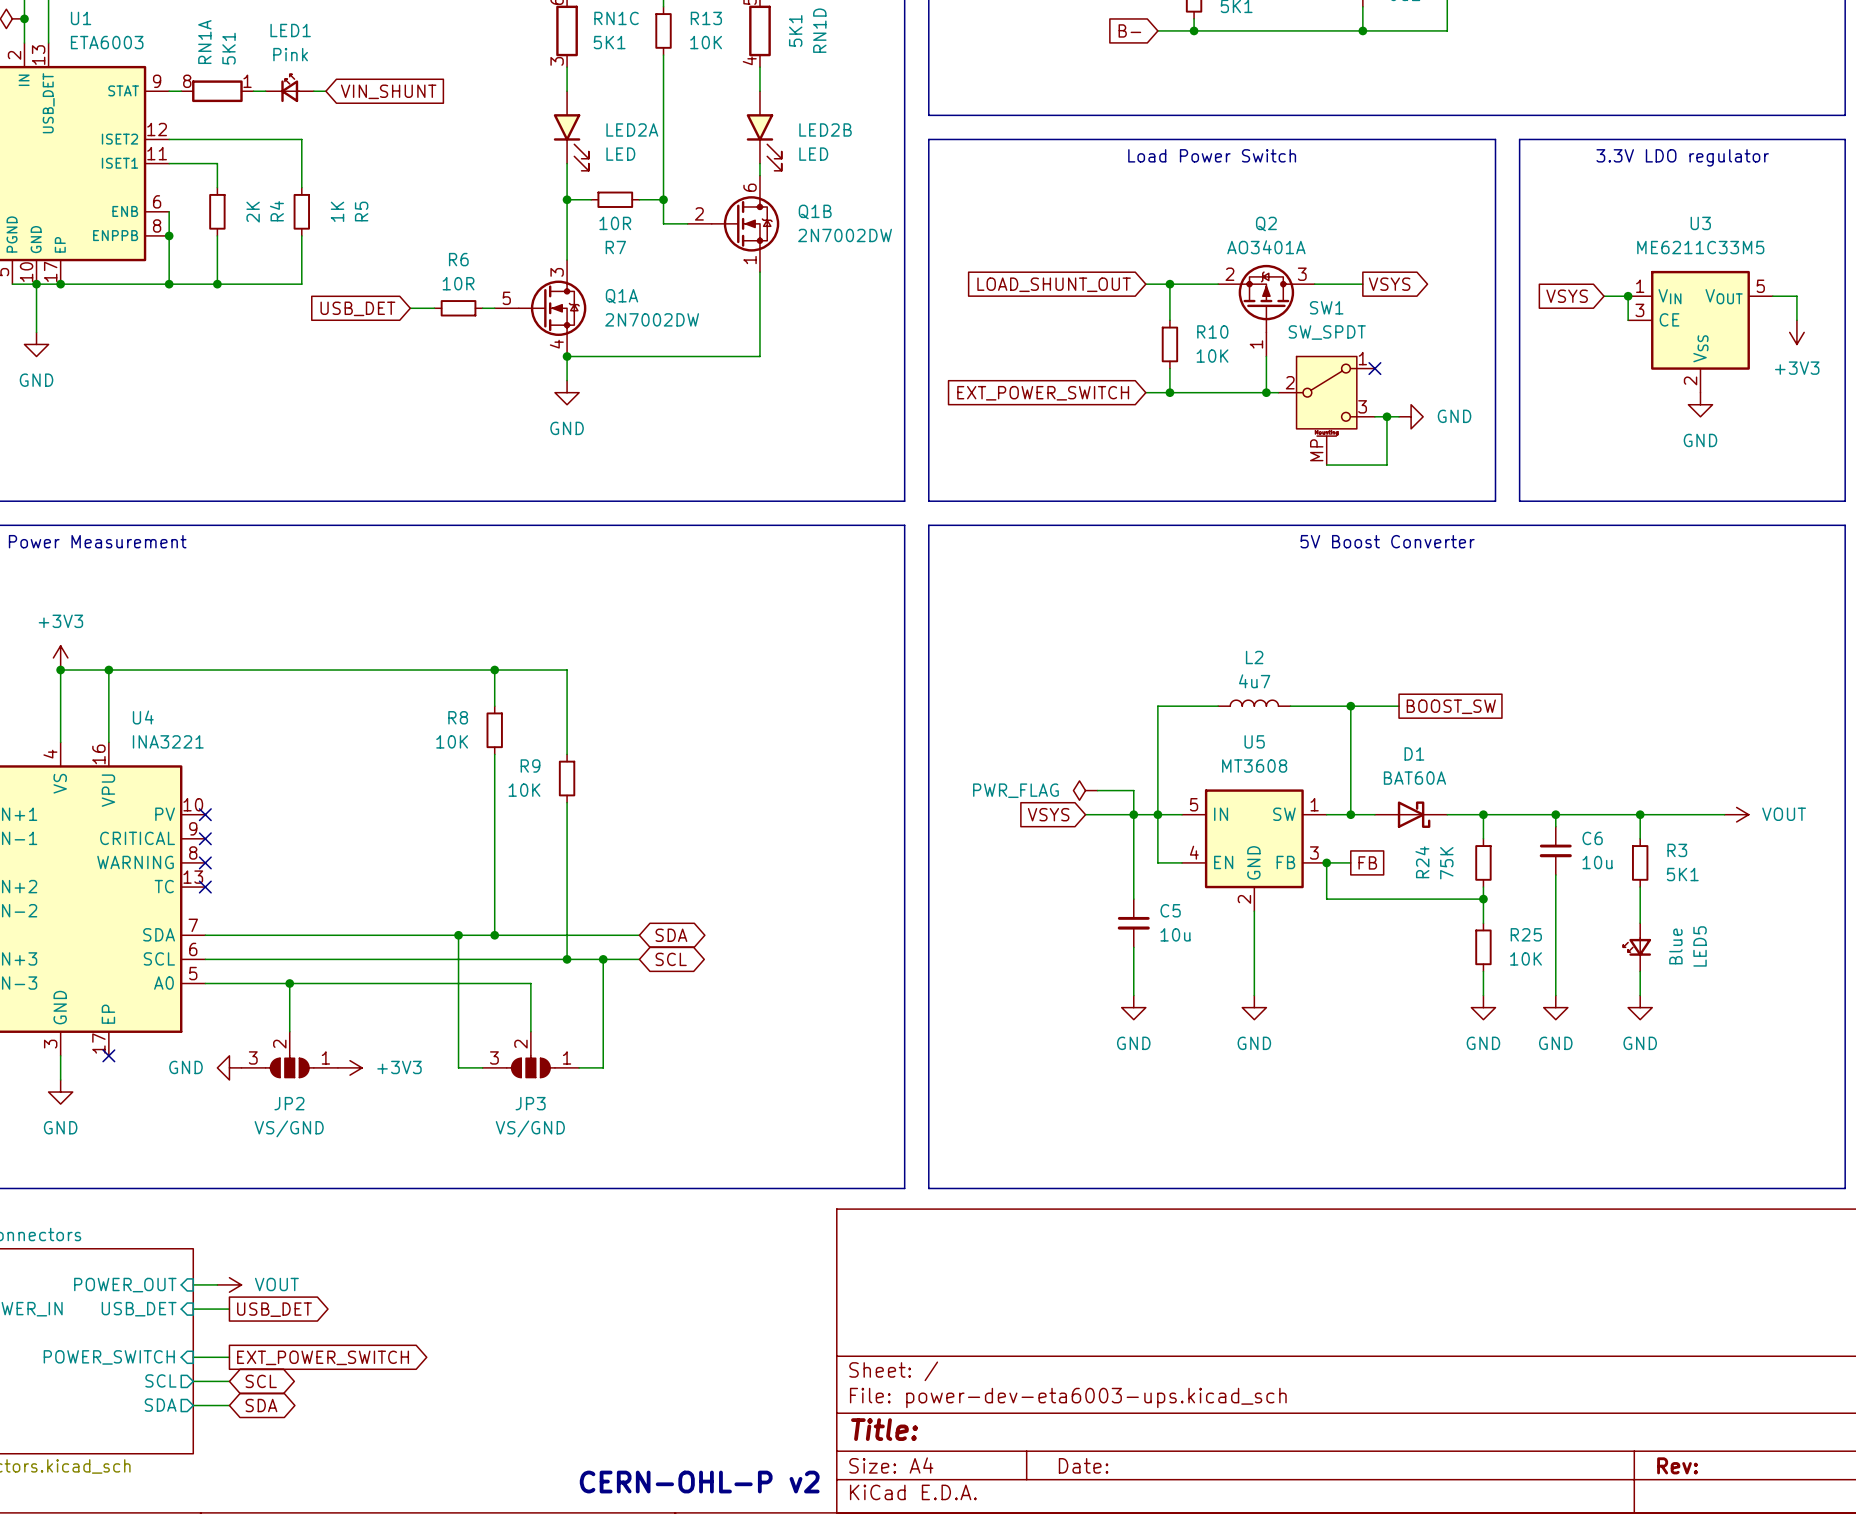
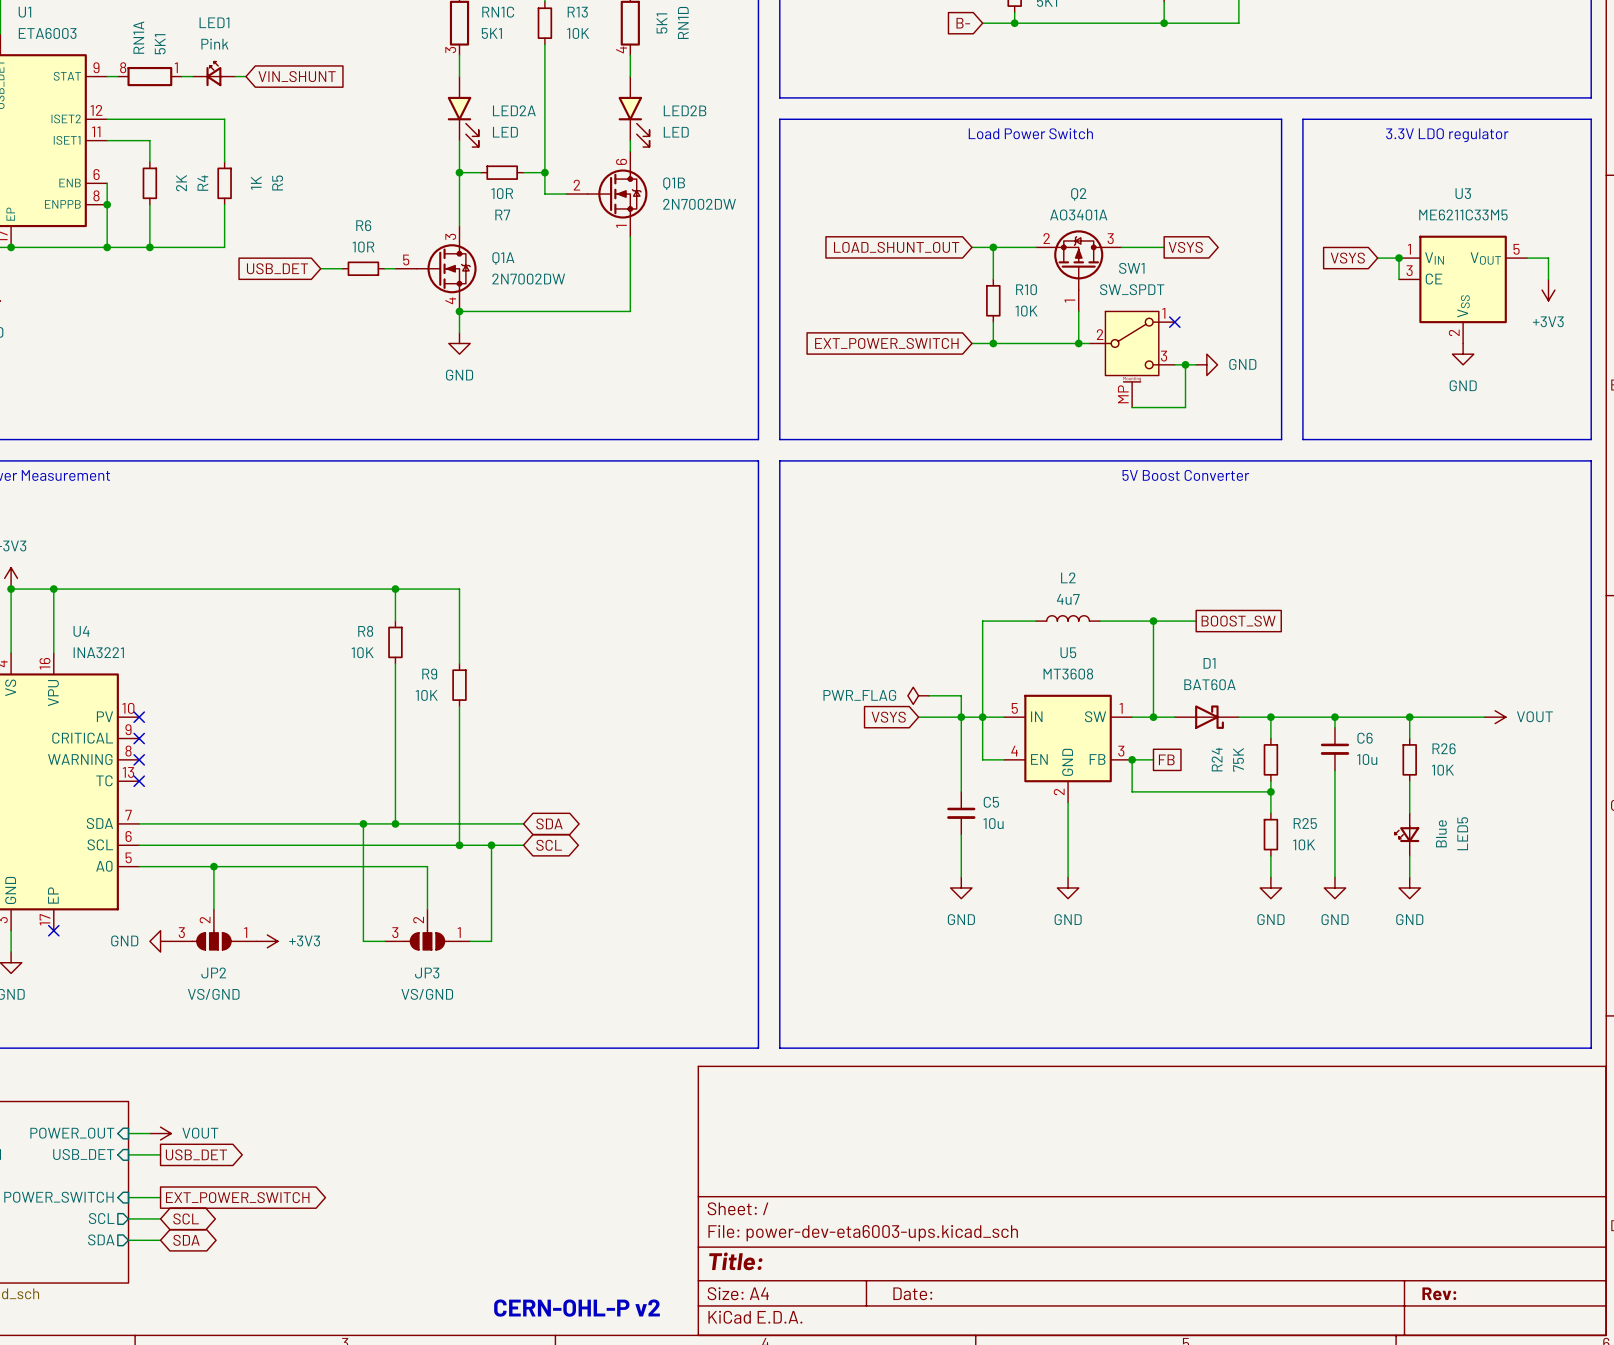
R3 name: R3 (1677, 850) -> R26 (1444, 748)
R3 value: 5K1 (1682, 874) -> 10K (1442, 770)

